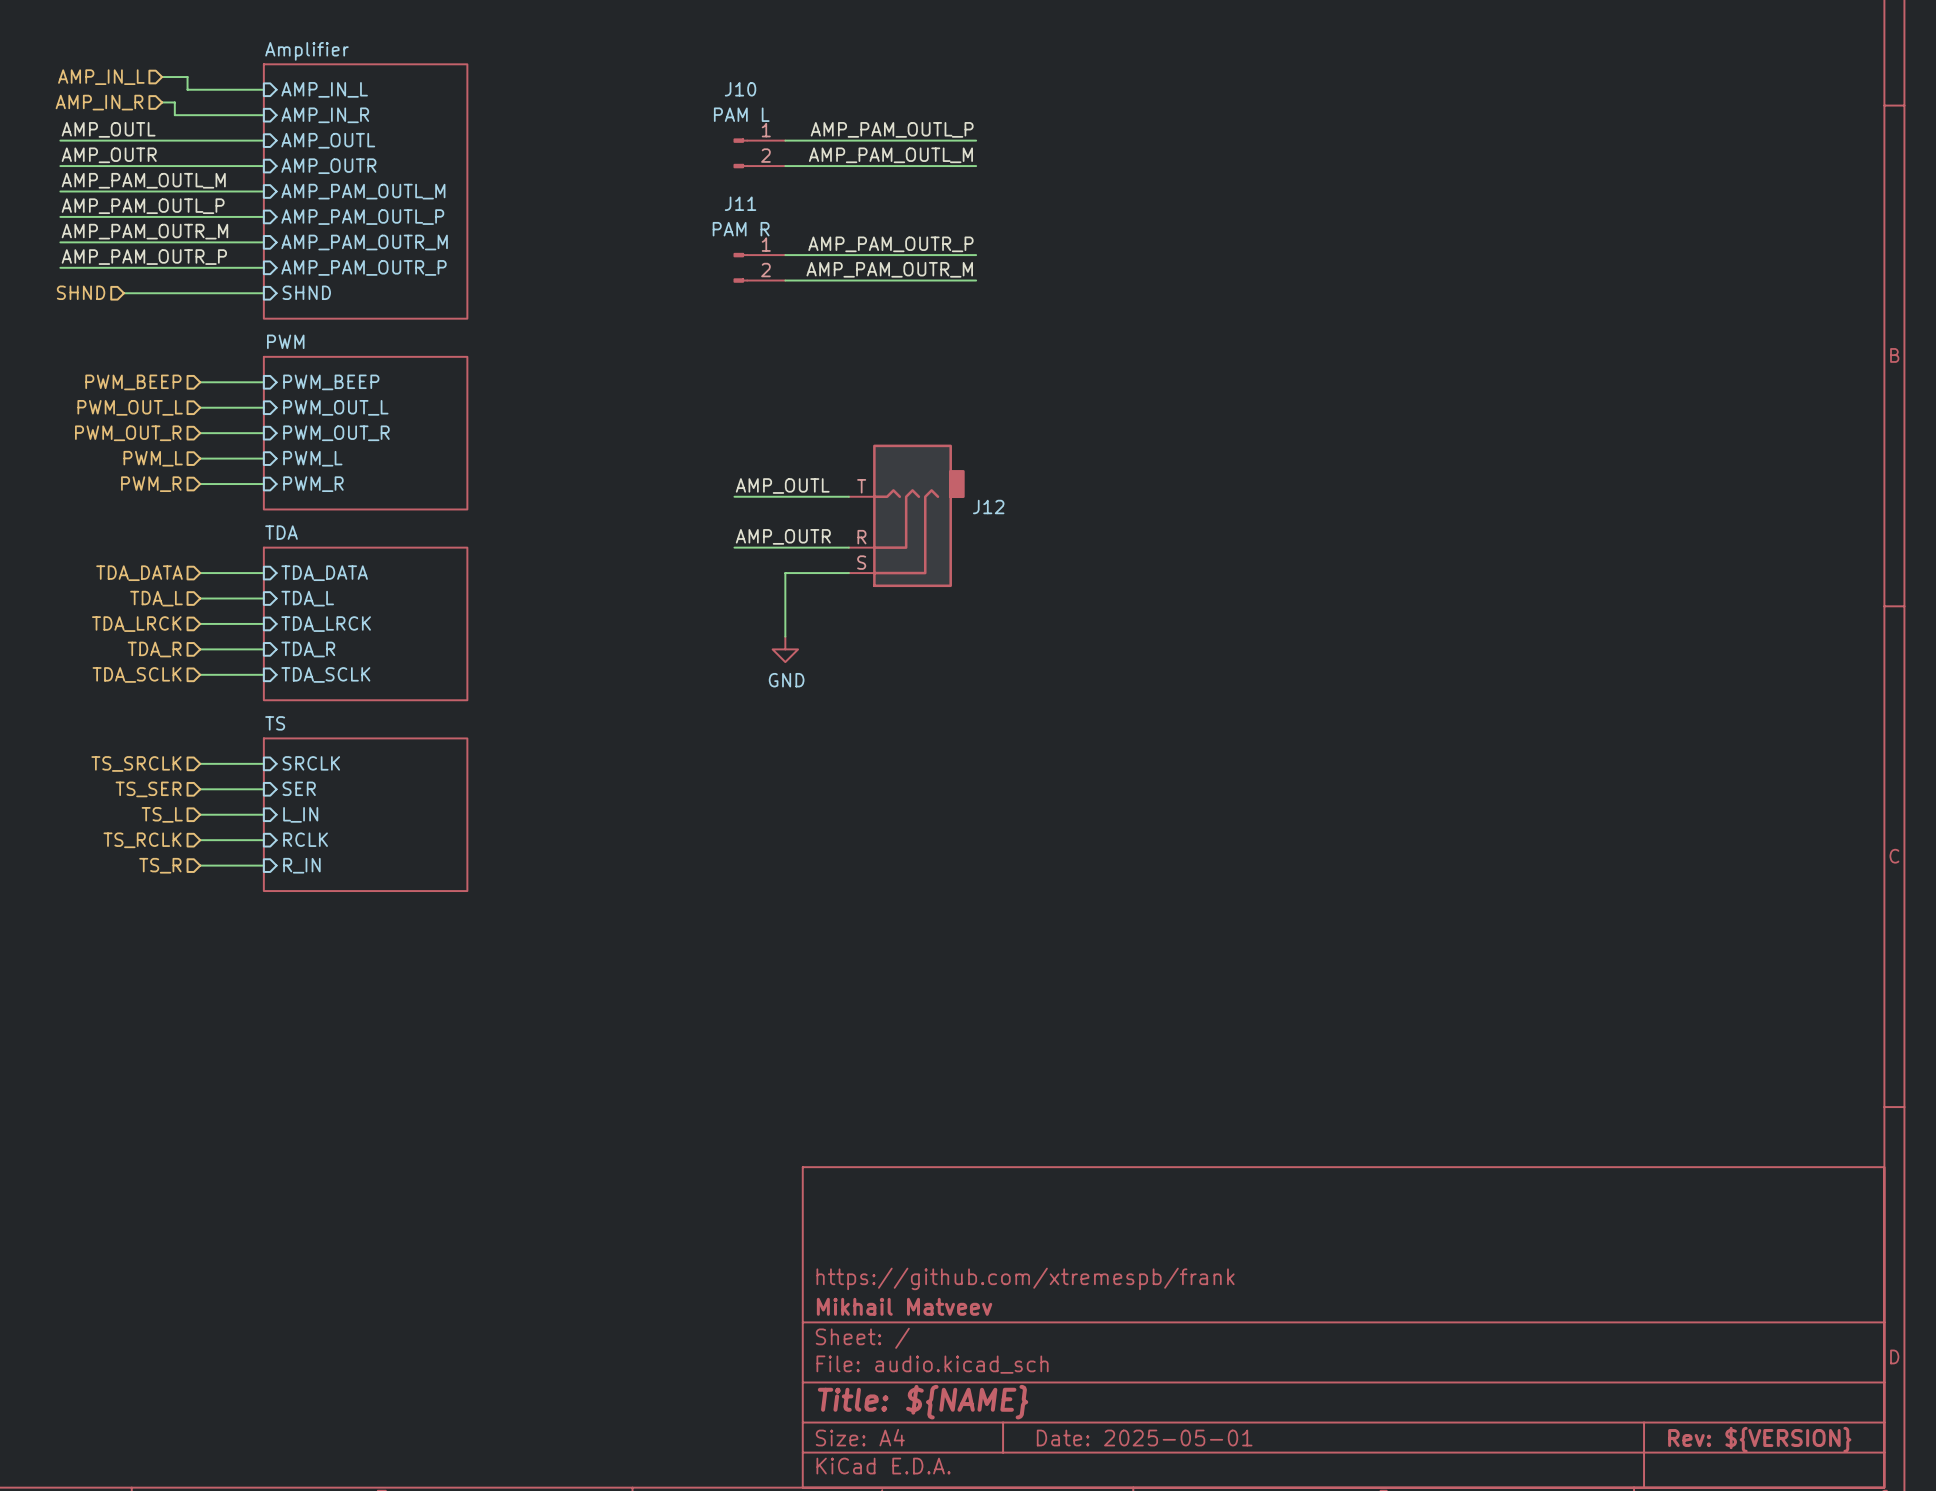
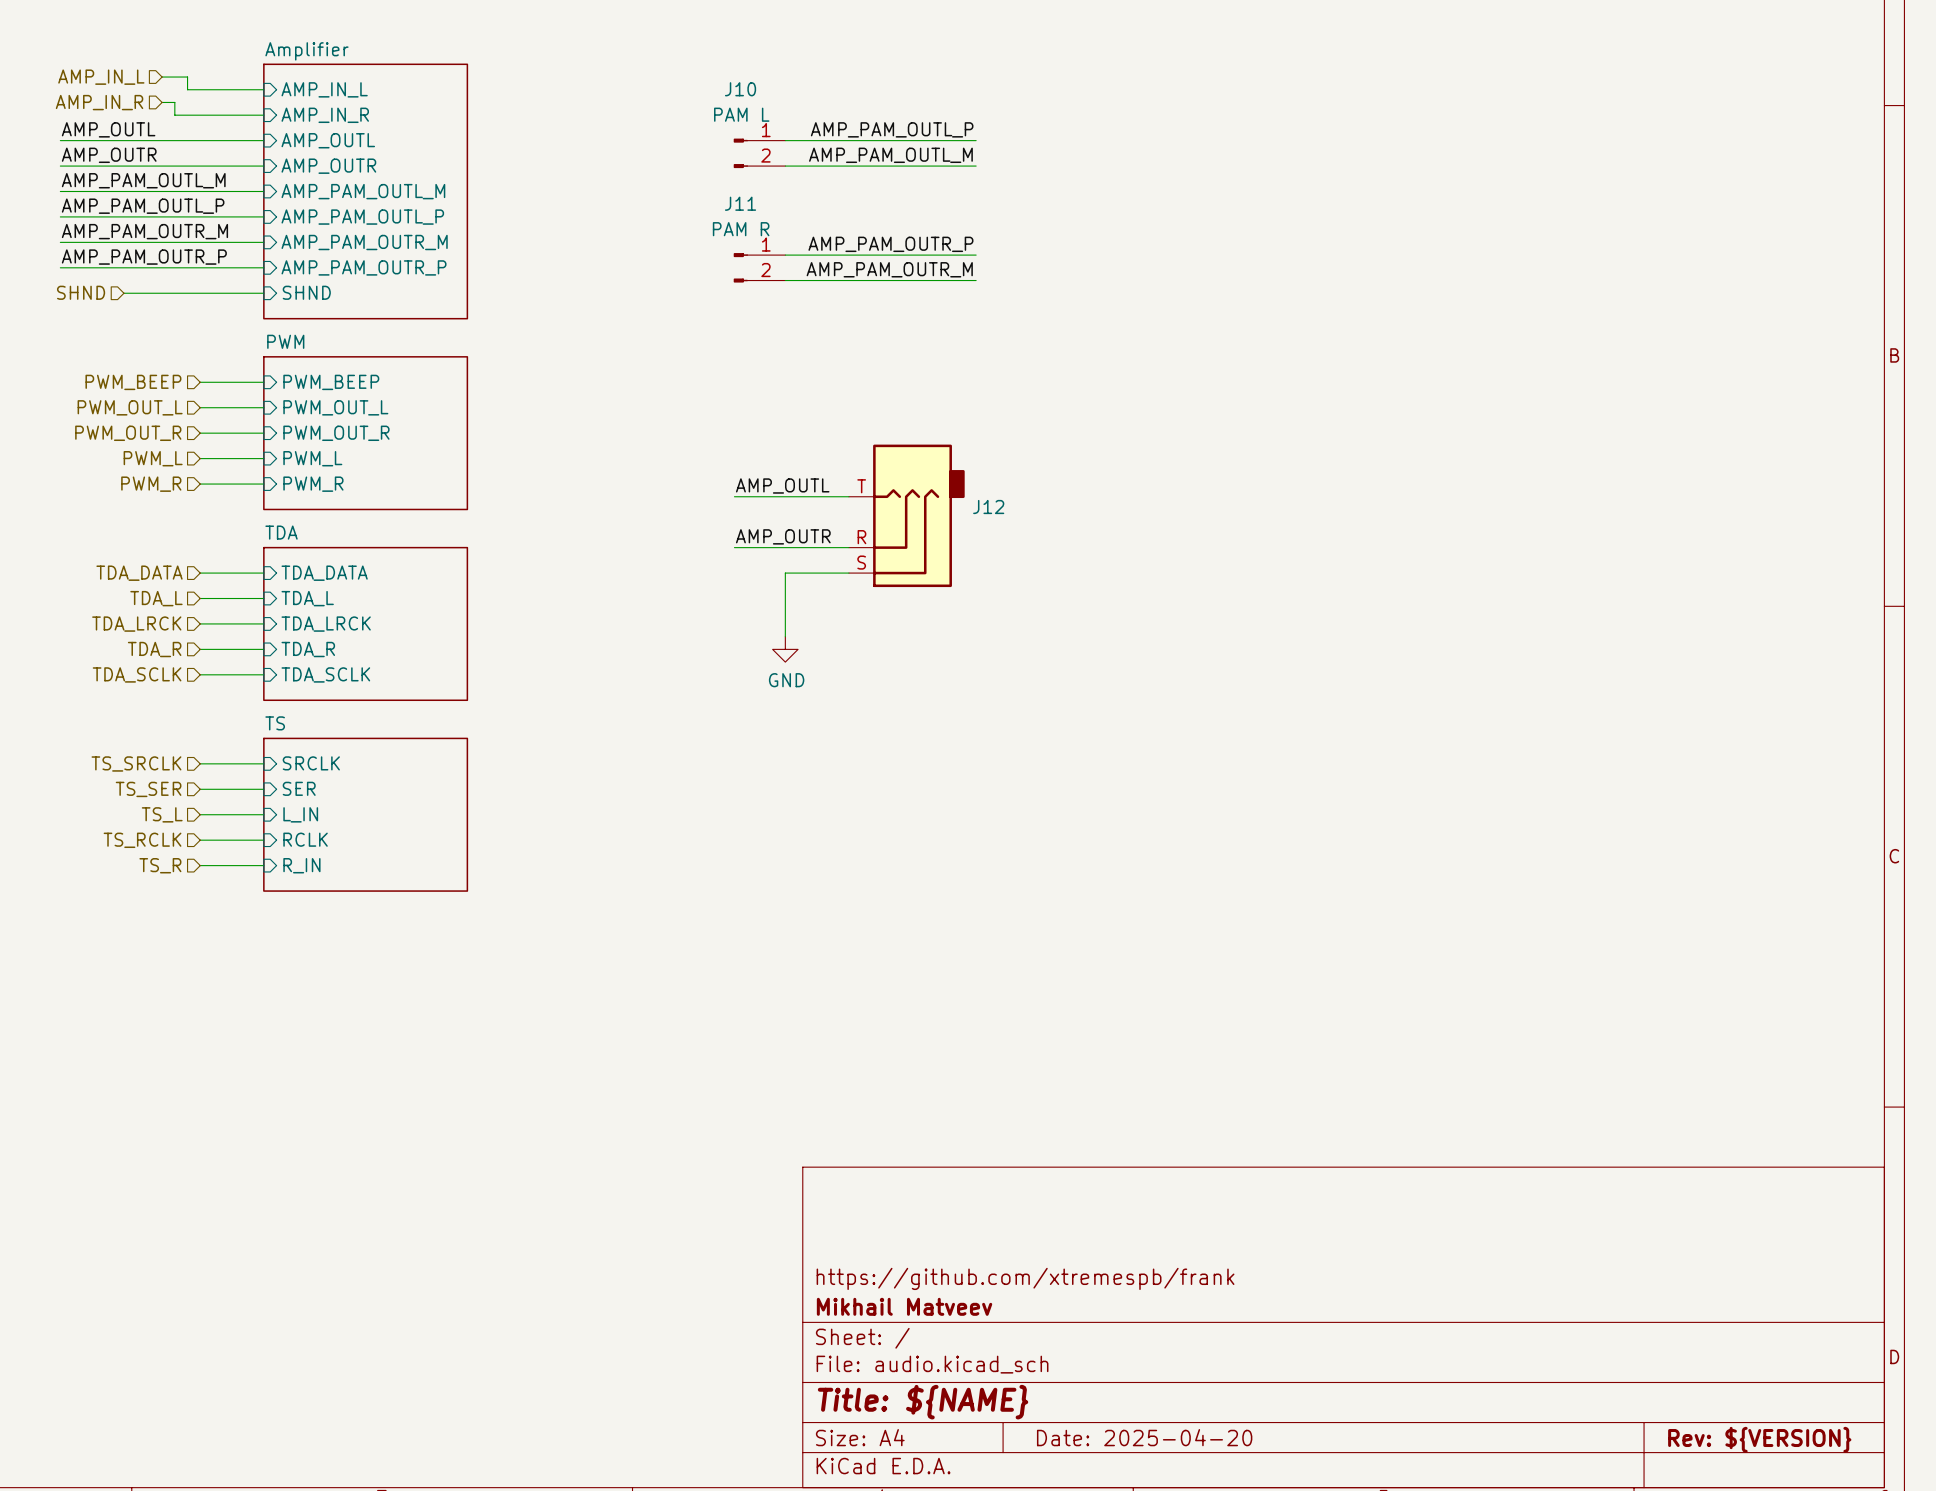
title block: Date: 2025-05-01 (1144, 1438) -> Date: 2025-04-20 (1144, 1437)

